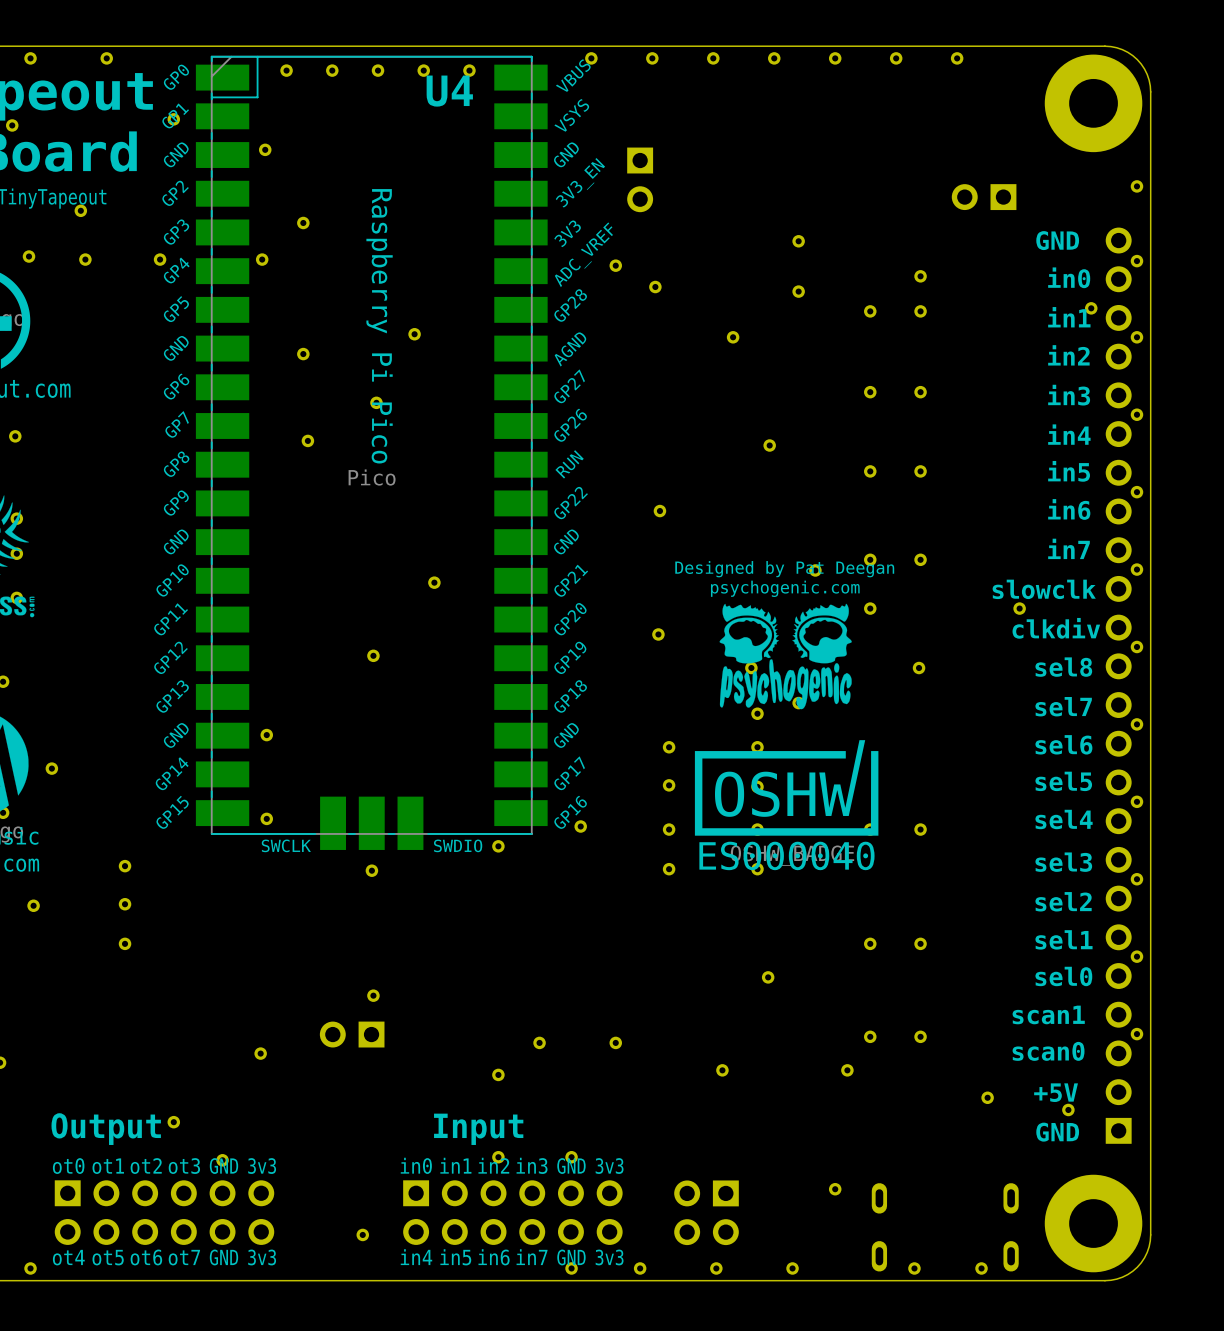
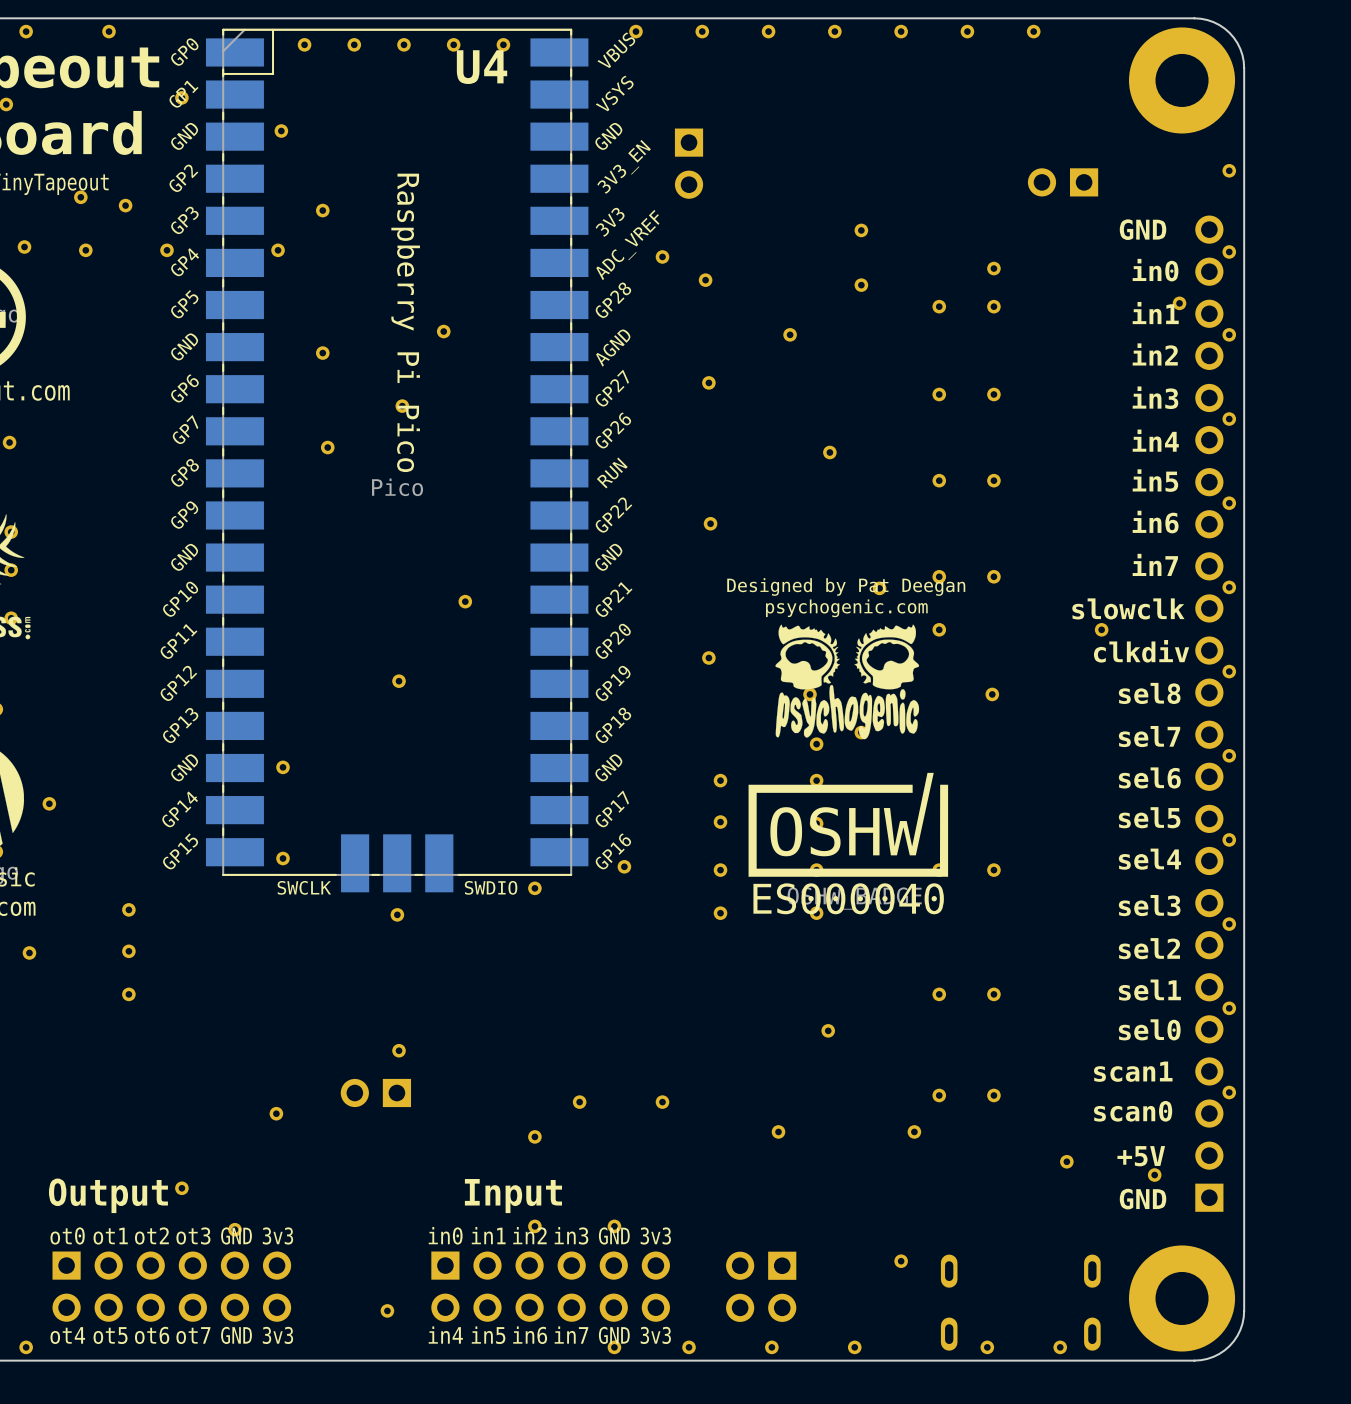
part: none -> (125, 205)
part: none -> (708, 382)

